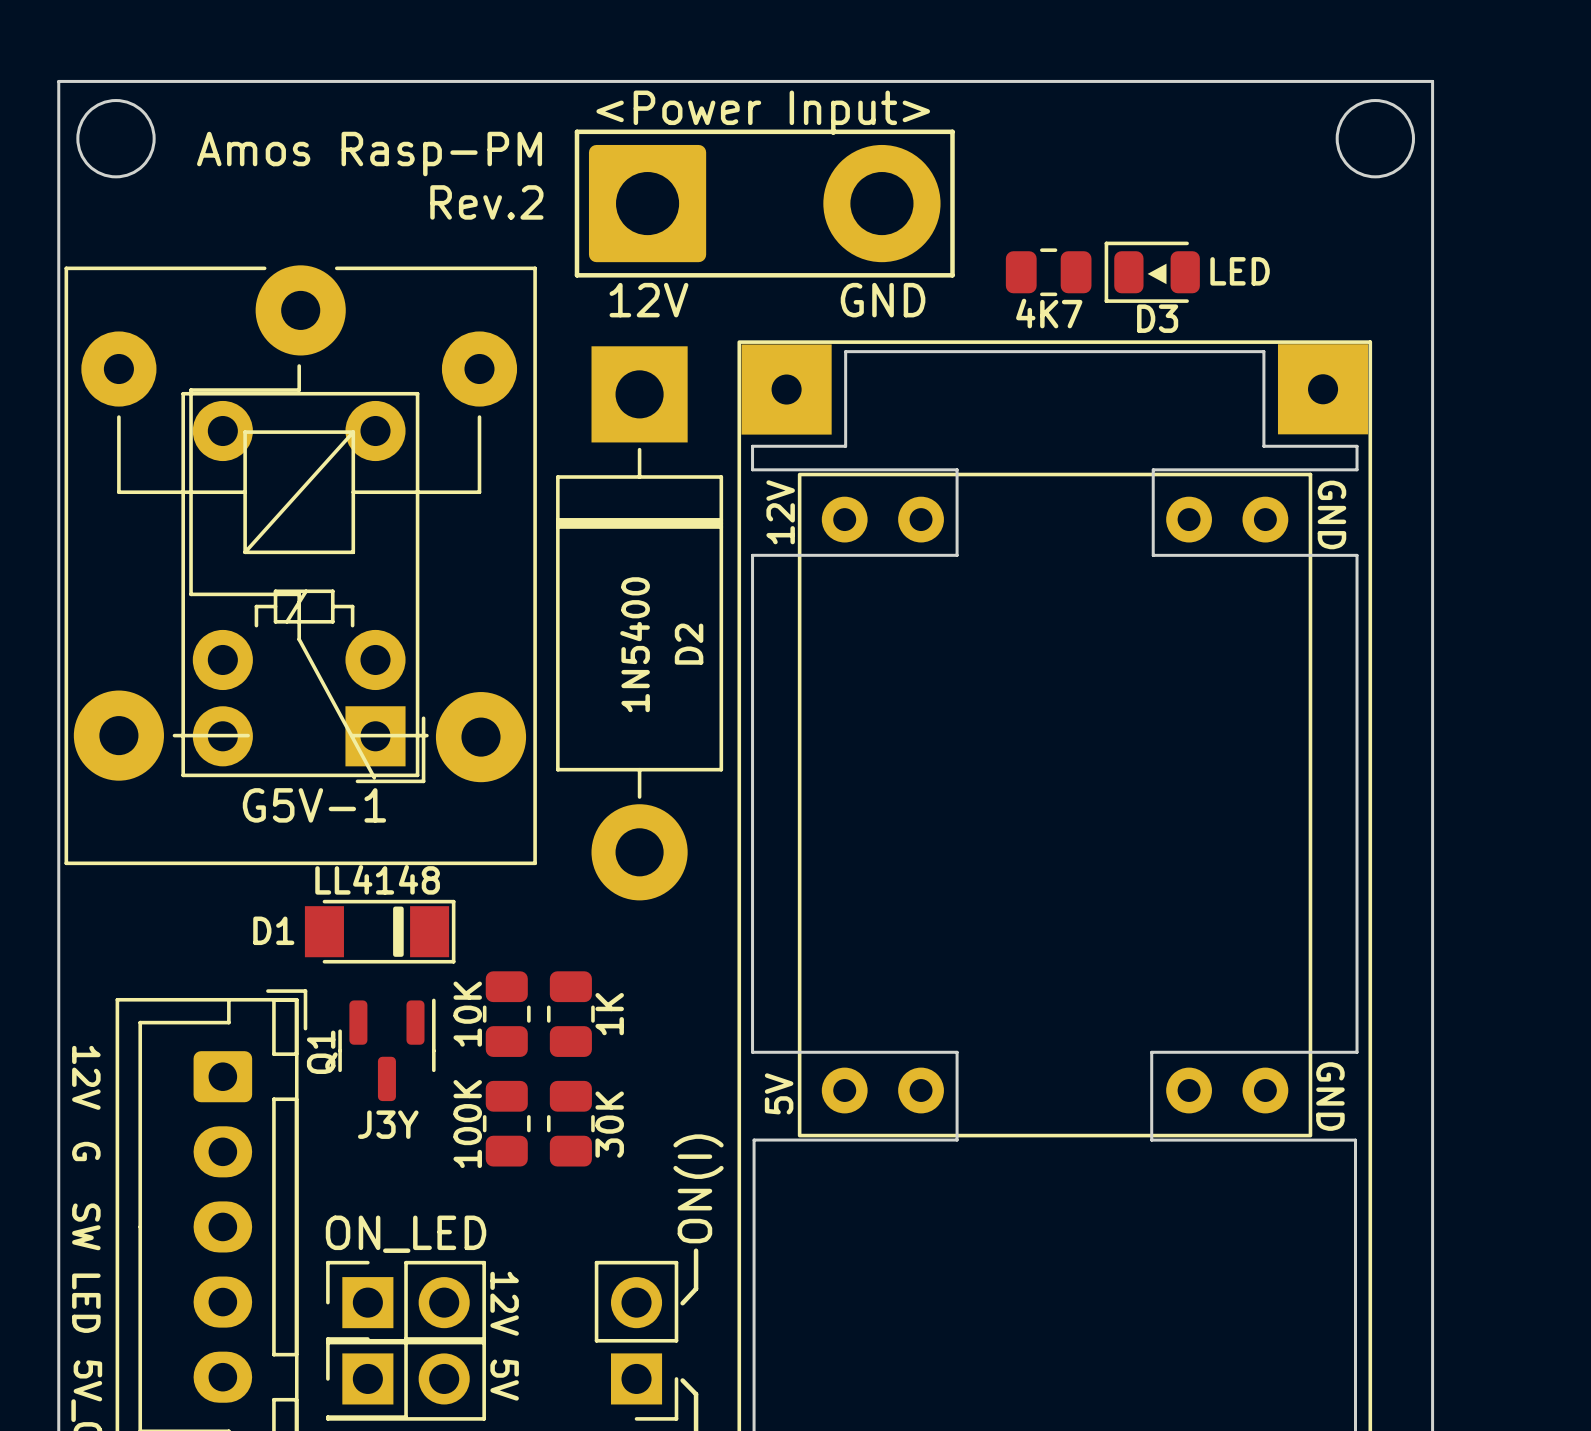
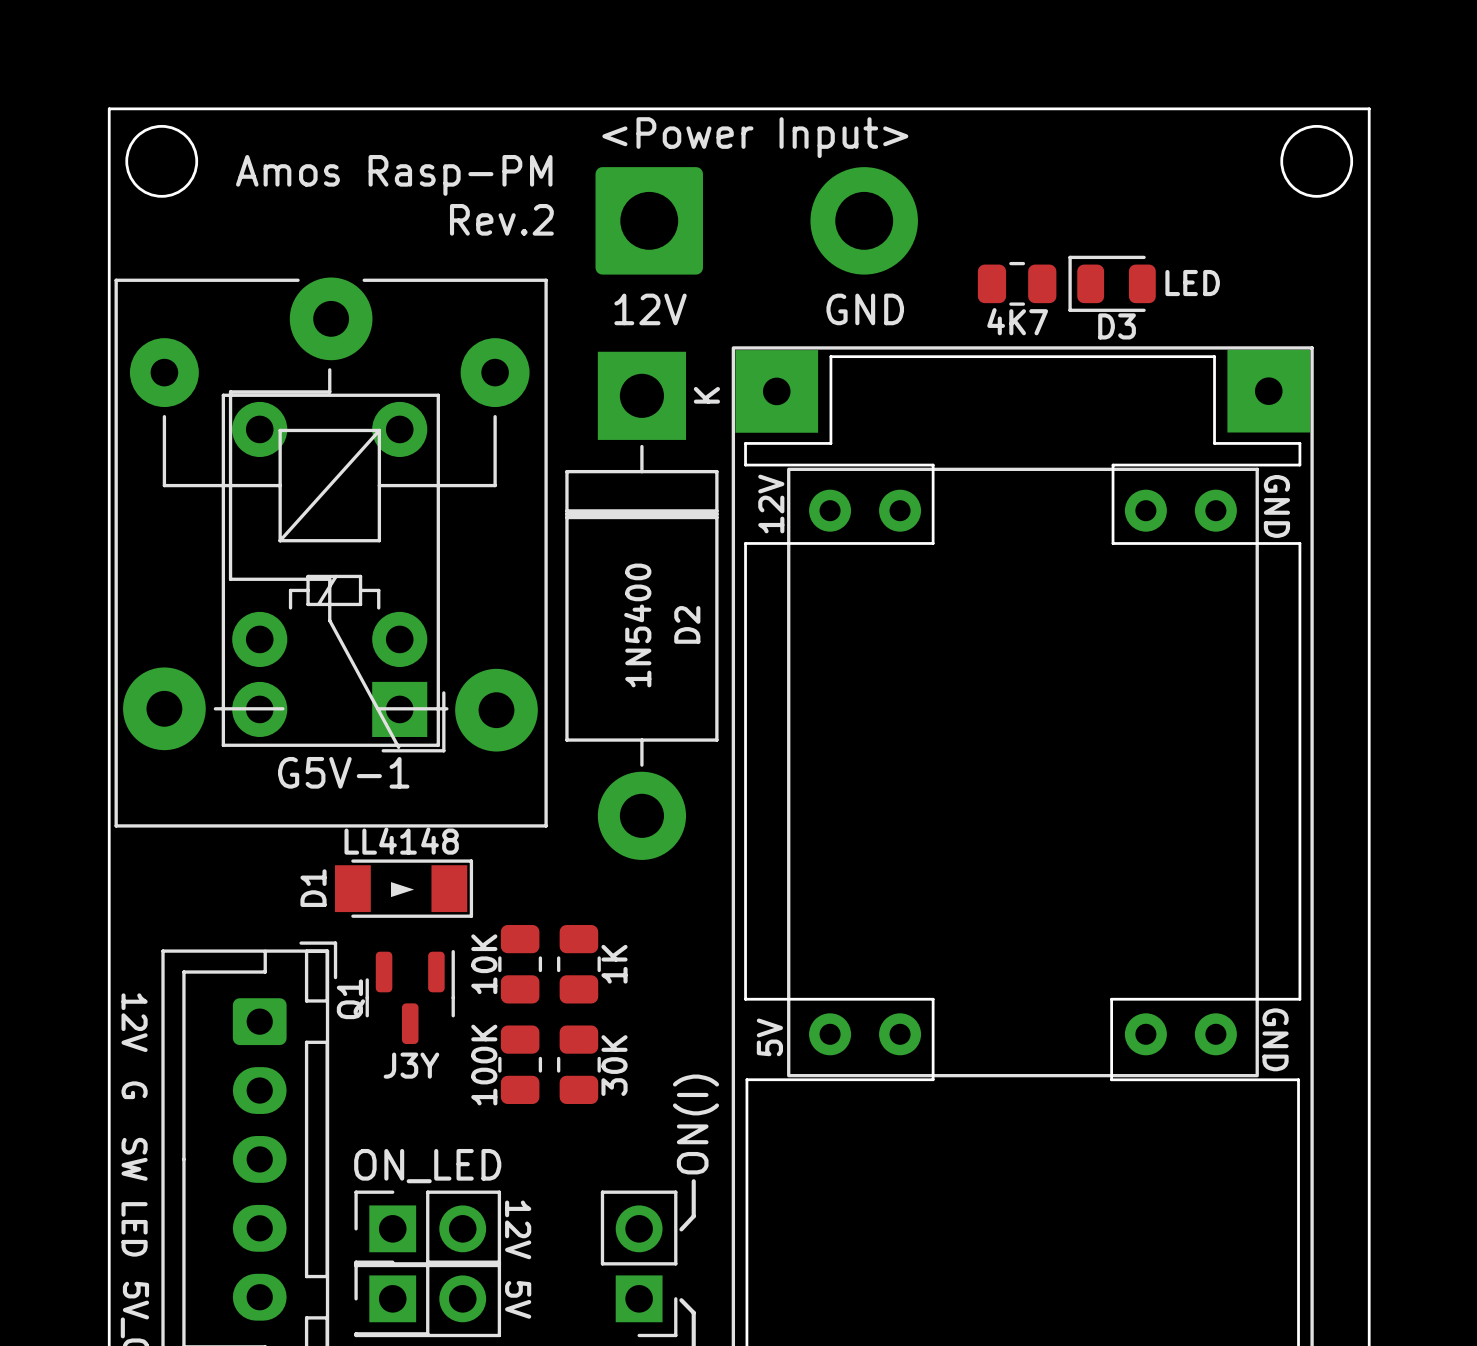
line: (576, 131) (952, 131) (952, 275) (576, 275) (576, 131) -> none
text: ◄ (1157, 273) -> none
D2 text: none -> K (706, 395)
drawing: [393, 906, 404, 957] -> none
D1 name rotation: 0° (273, 930) -> 90° counterclockwise (313, 888)
text: none -> ► (402, 889)

